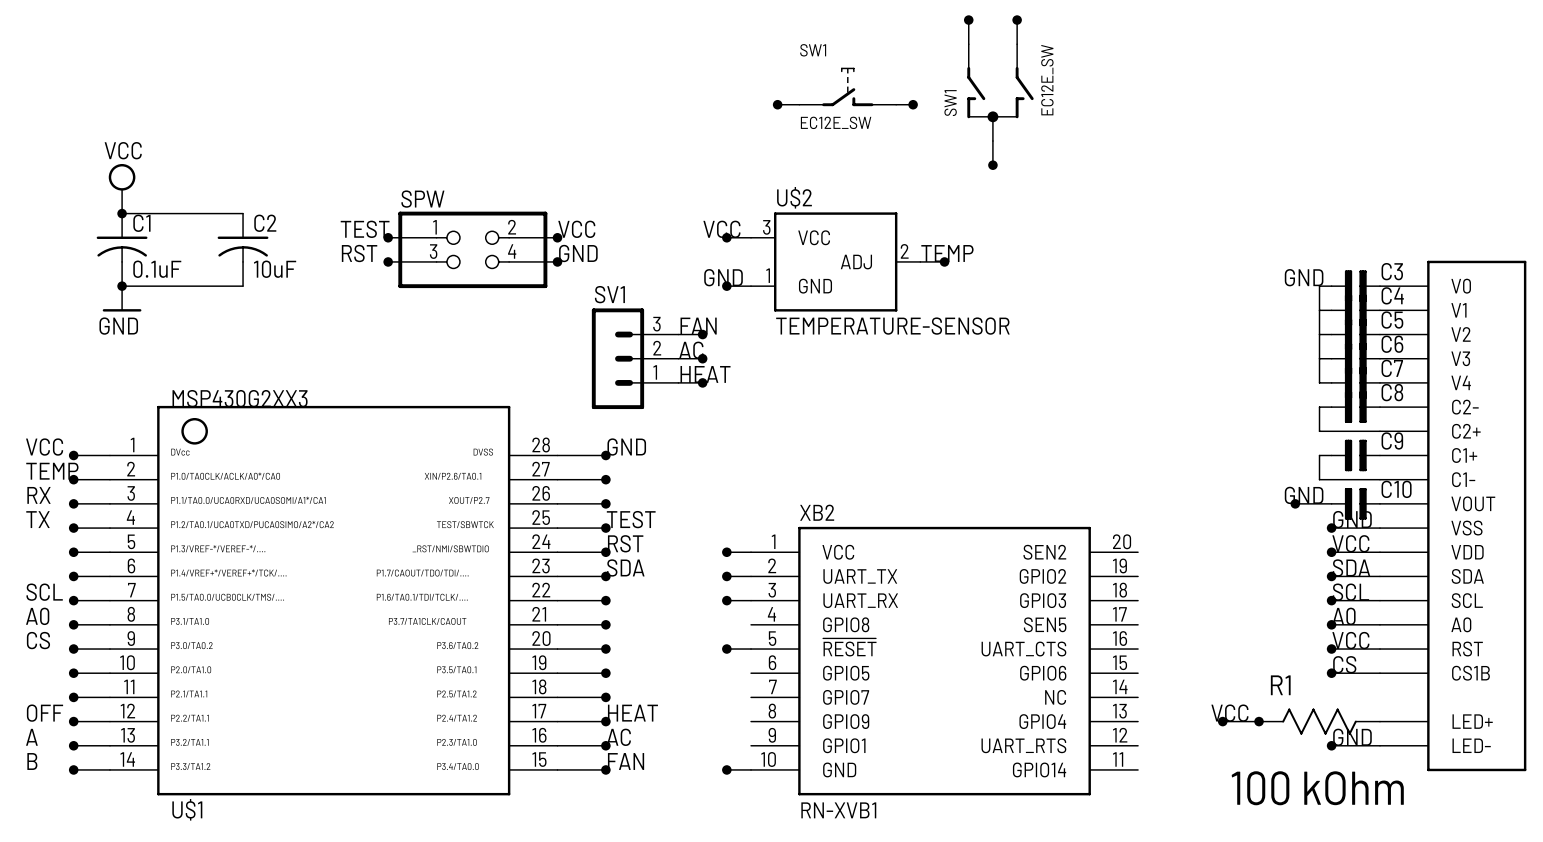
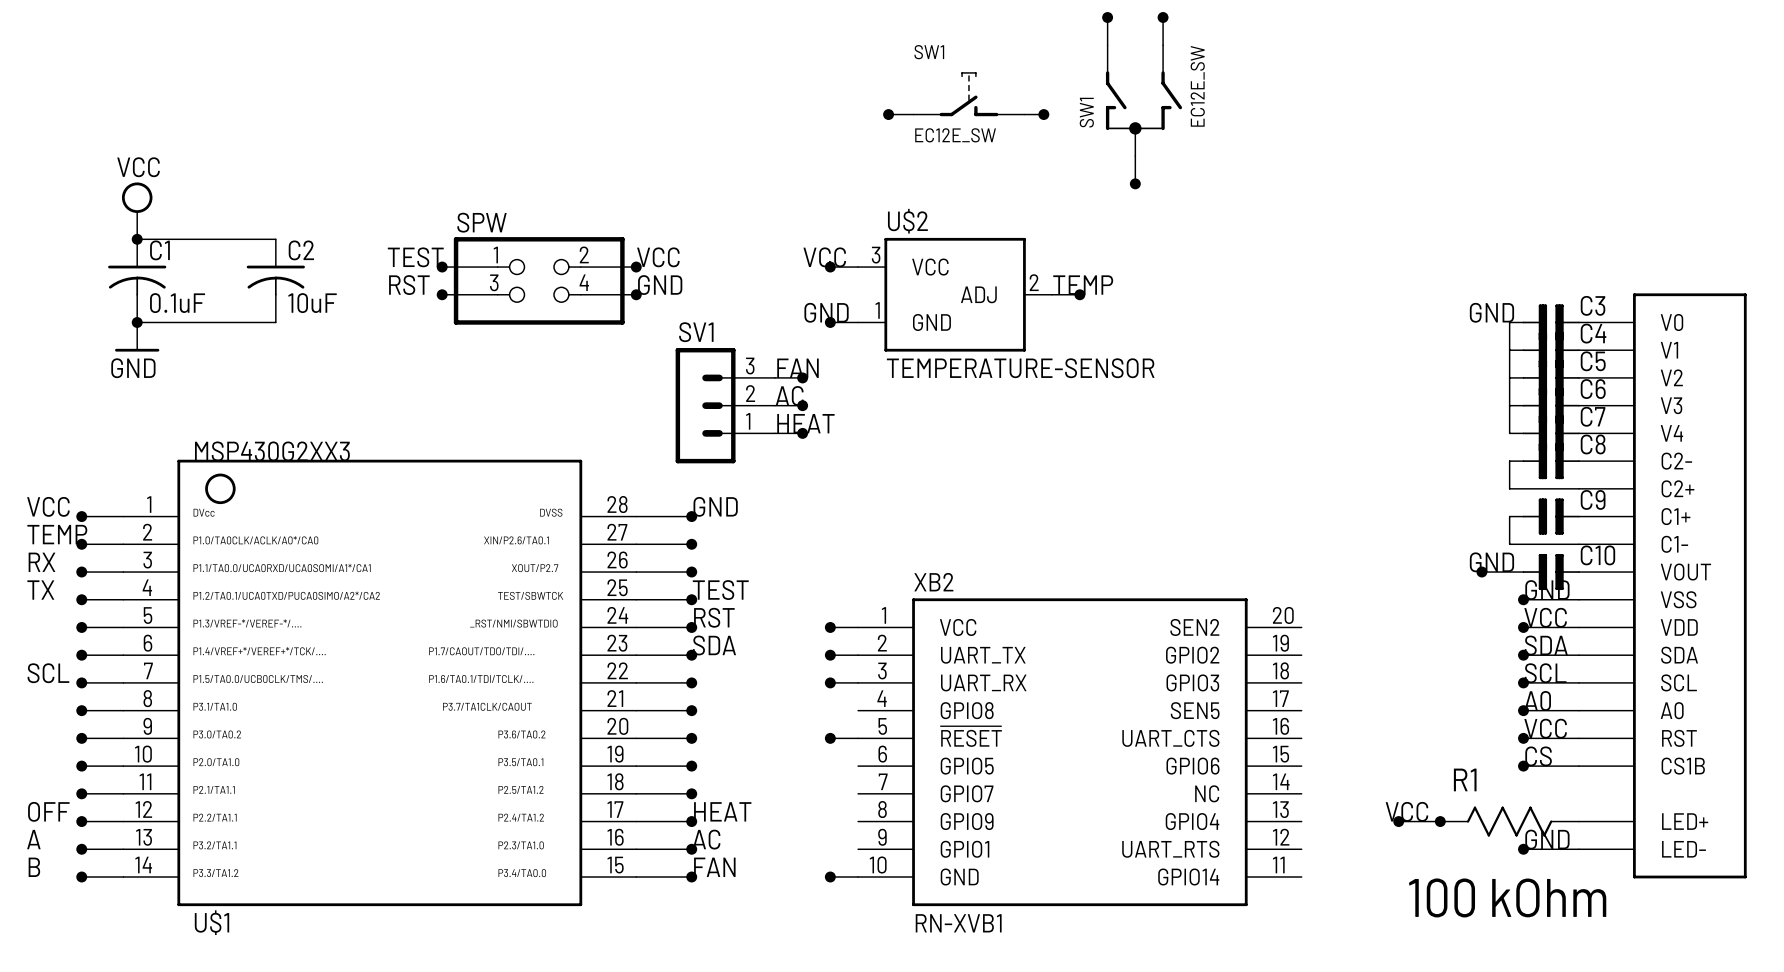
label: A0 (37, 616) -> none
label: CS (38, 640) -> none

